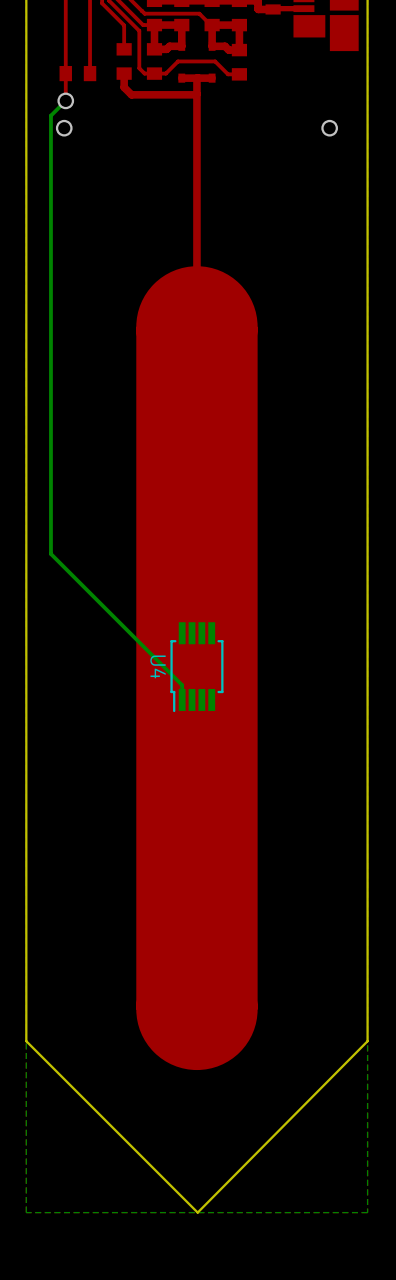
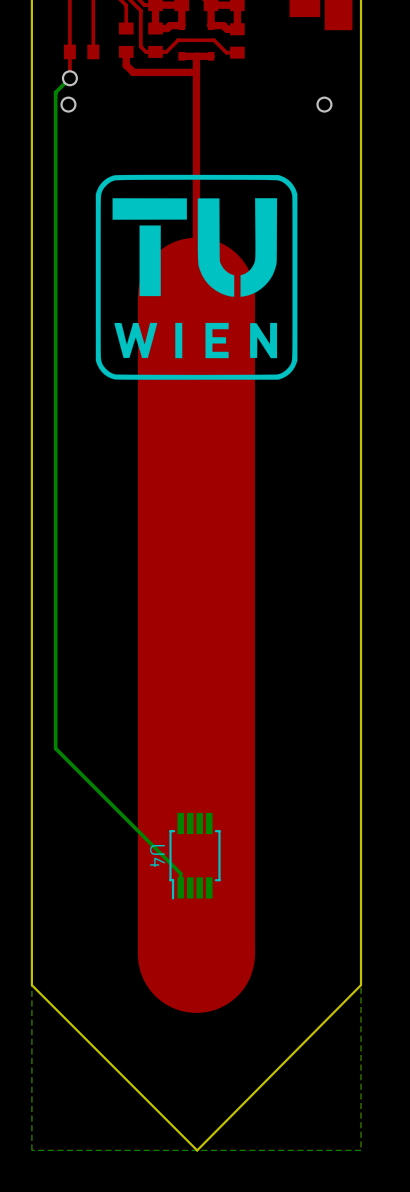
drawing: none -> [95, 174, 298, 380]
bottom track: (50, 553) (182, 685) (182, 699) -> (55, 515) (55, 748) (180, 873) (180, 887)
U4 position: (196, 667) -> (194, 856)

